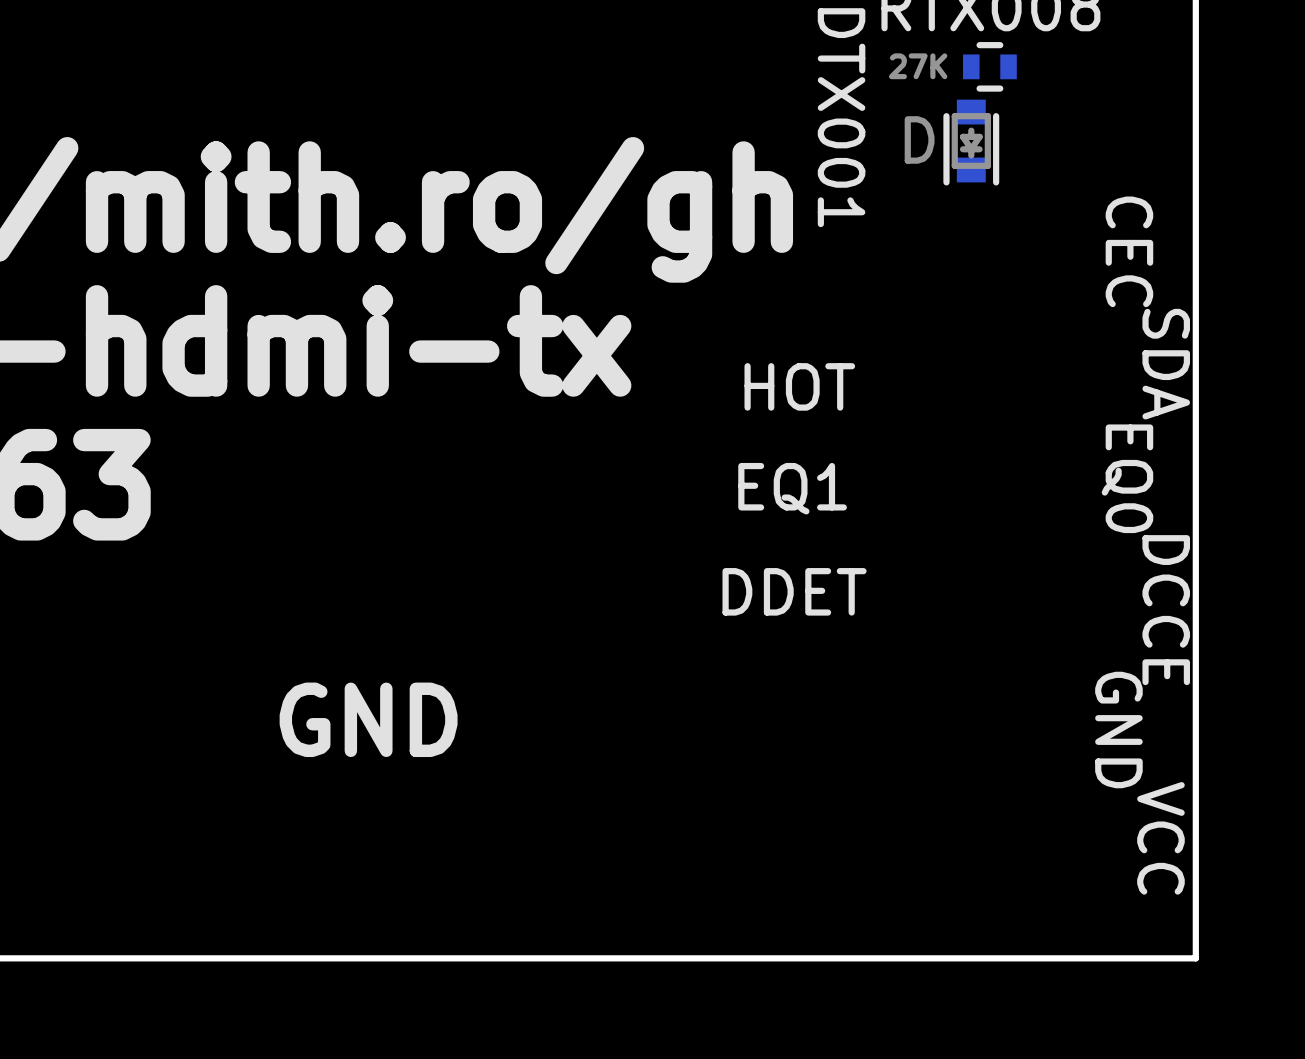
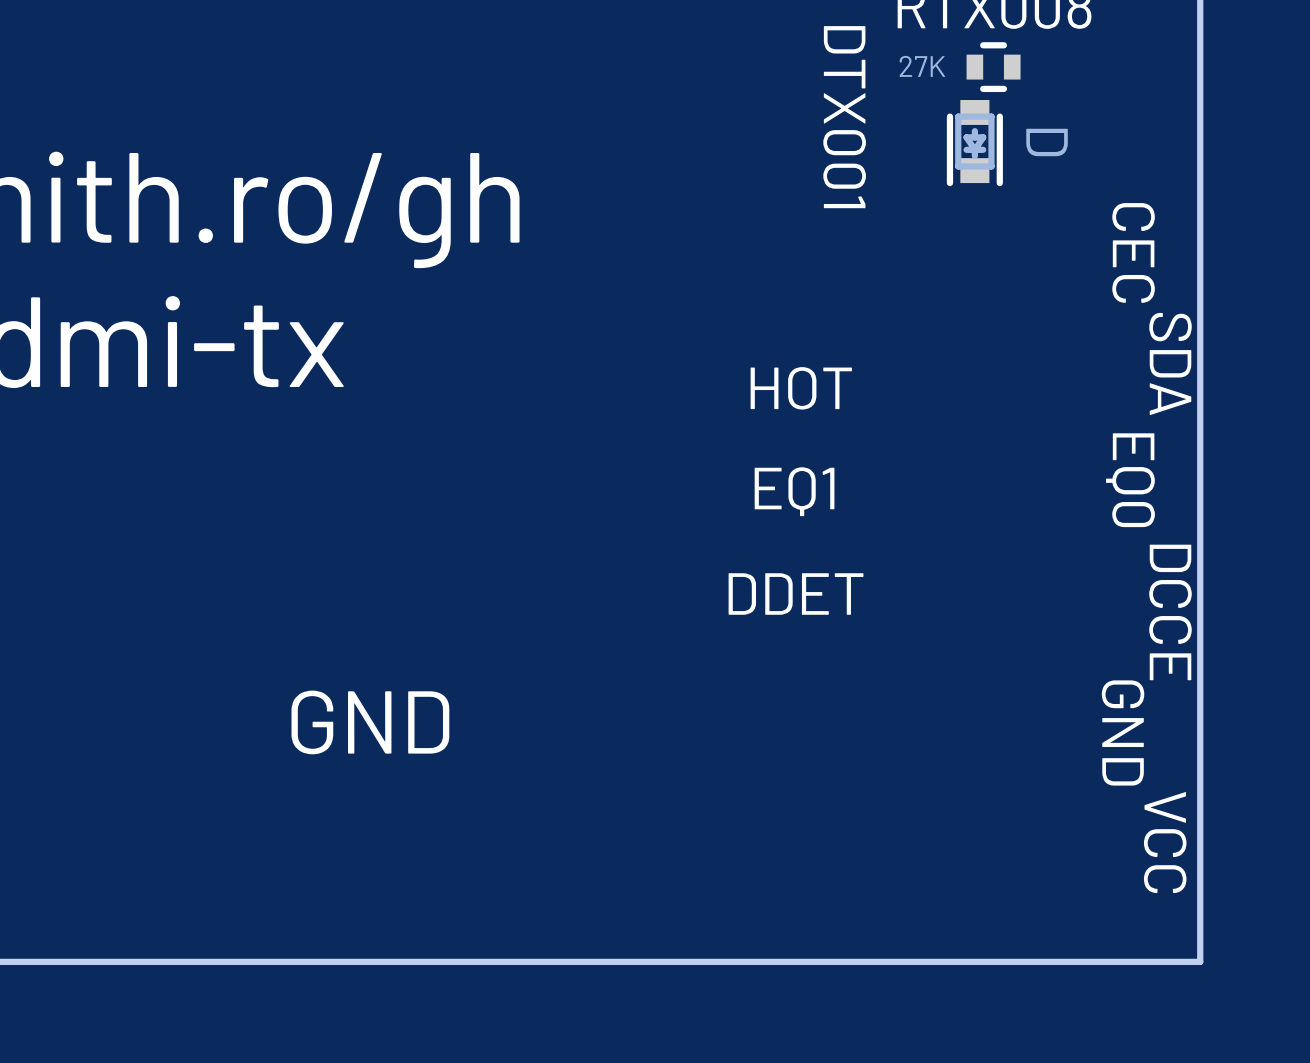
DTX001 value rotation: 0° (919, 139) -> 90° clockwise (1047, 142)
DTX001 value position: D (919, 139) -> D (1047, 142)

